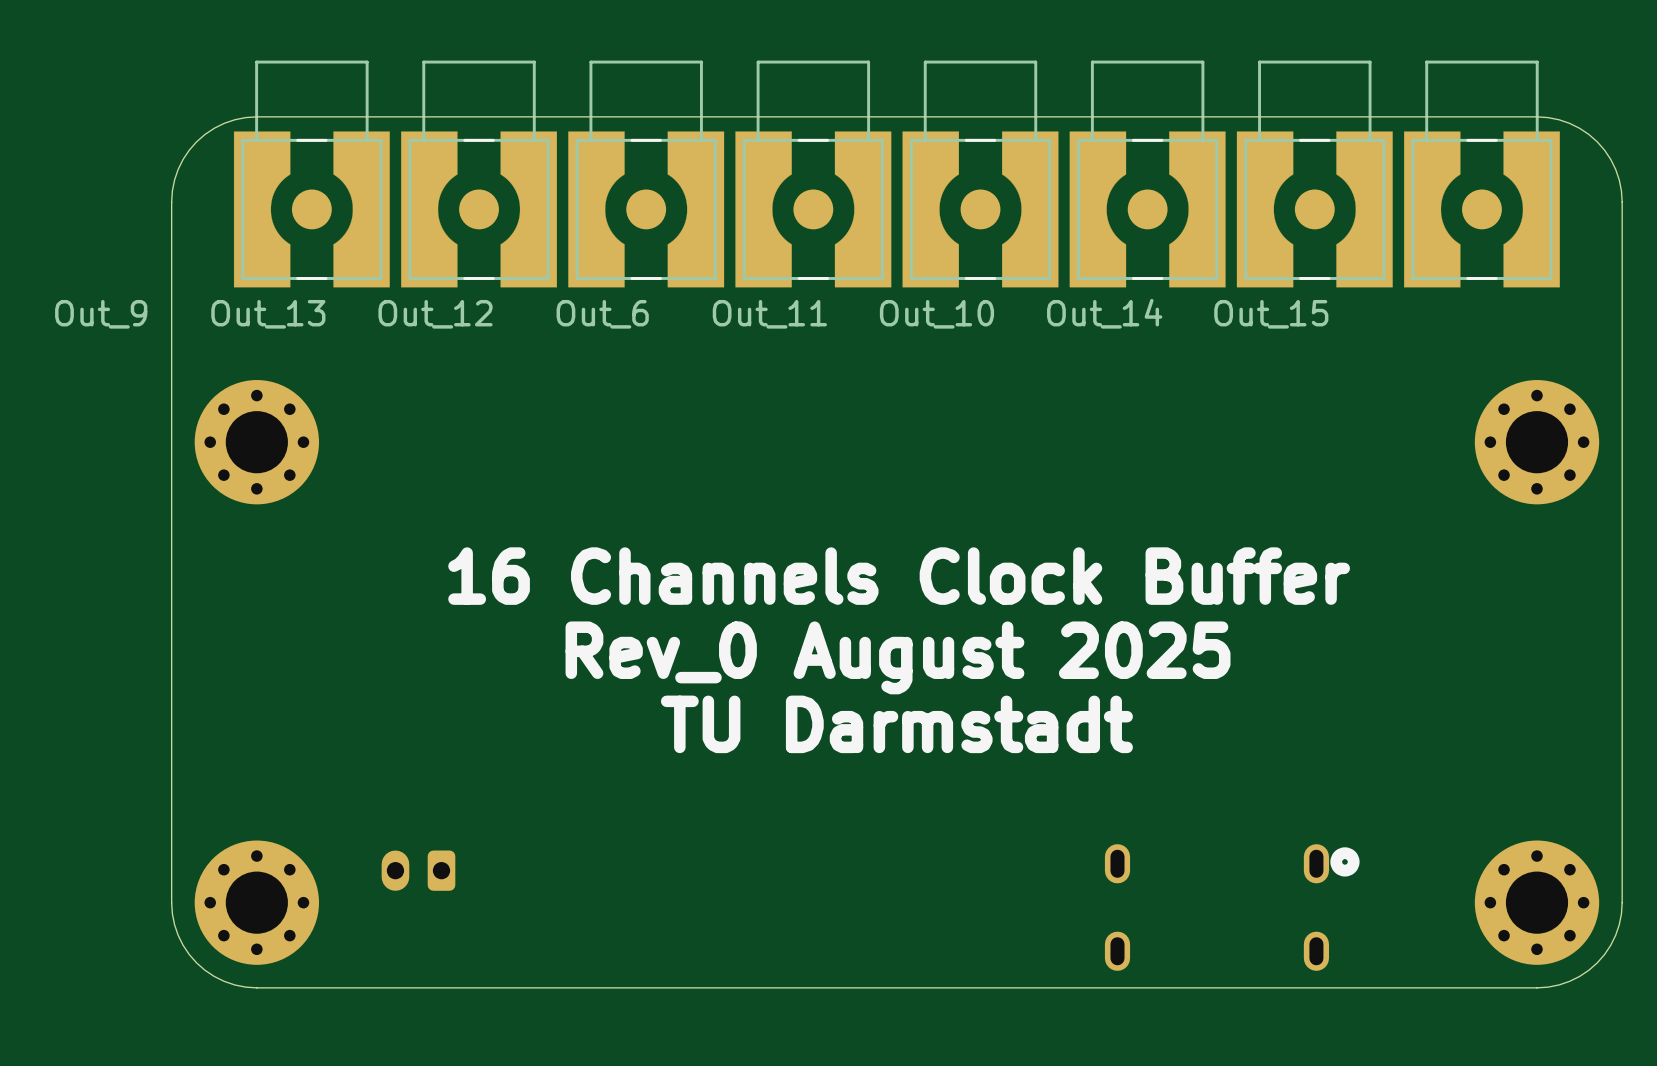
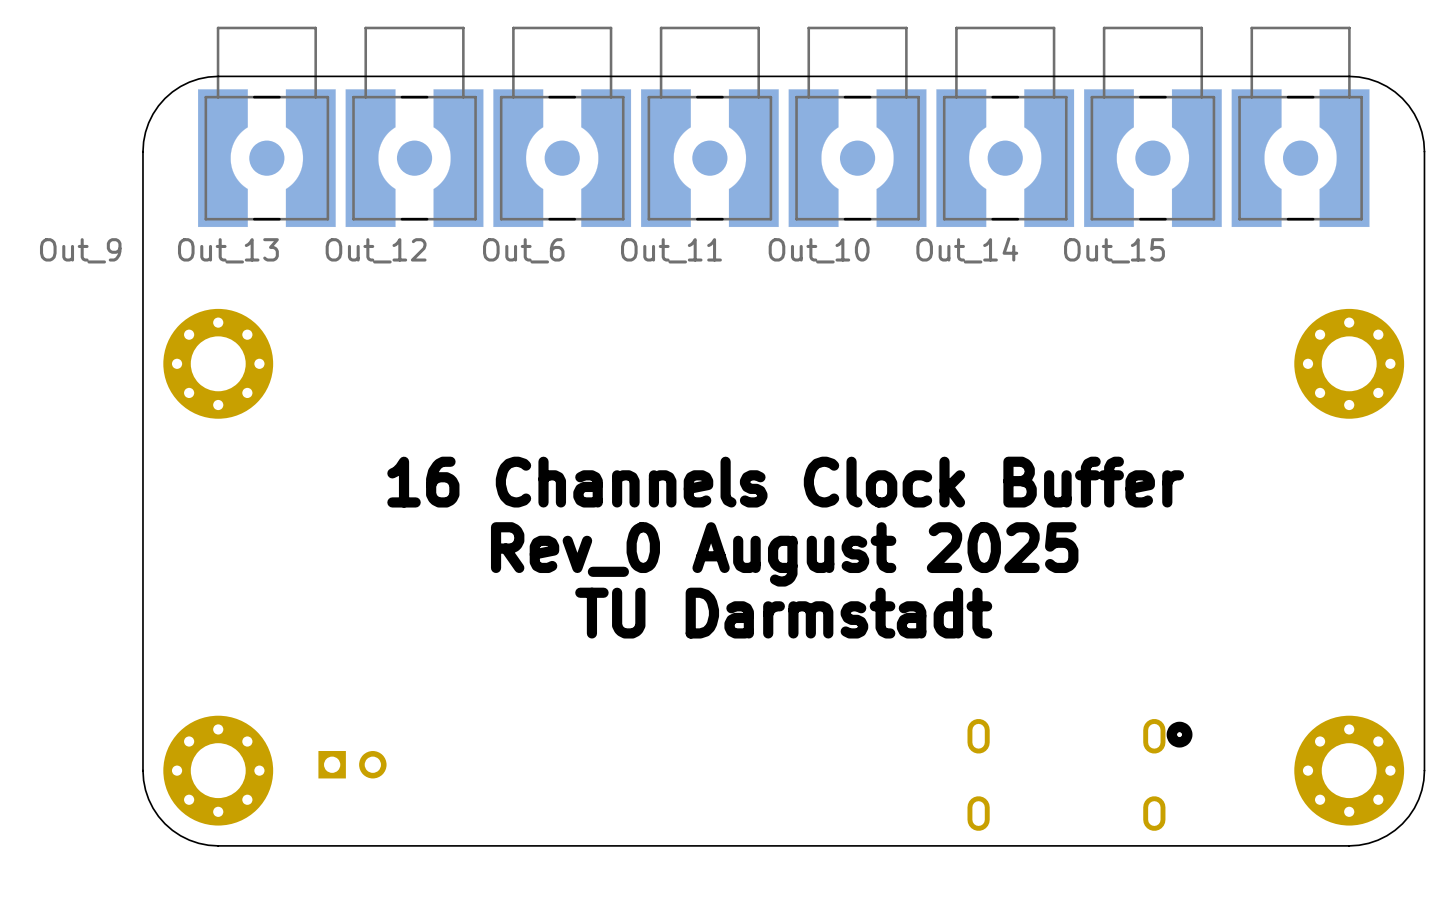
part: (418, 870) -> none
part: none -> (352, 764)

